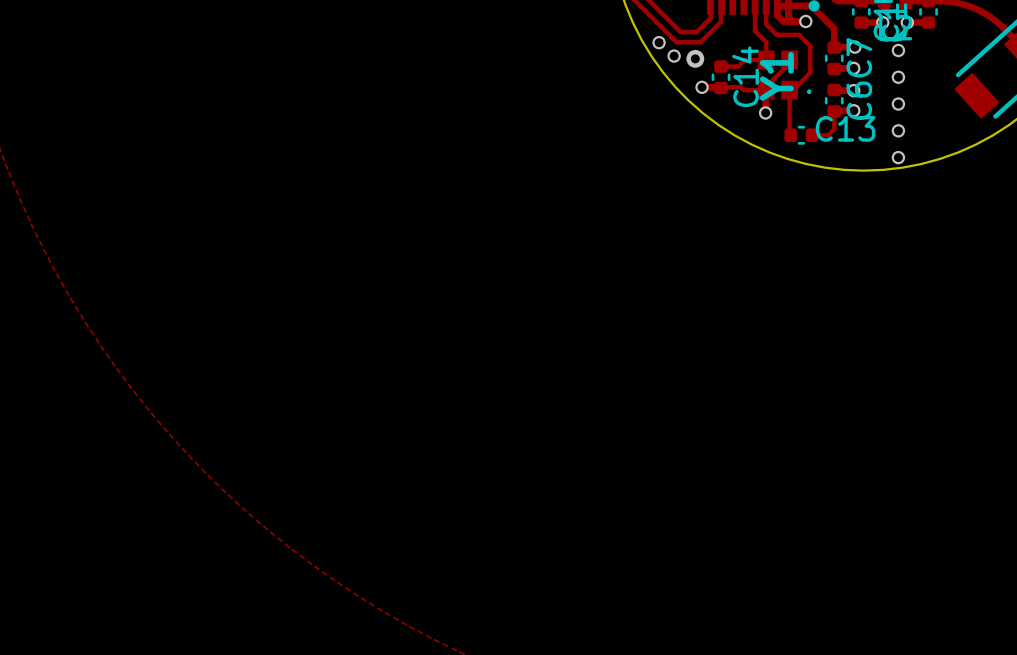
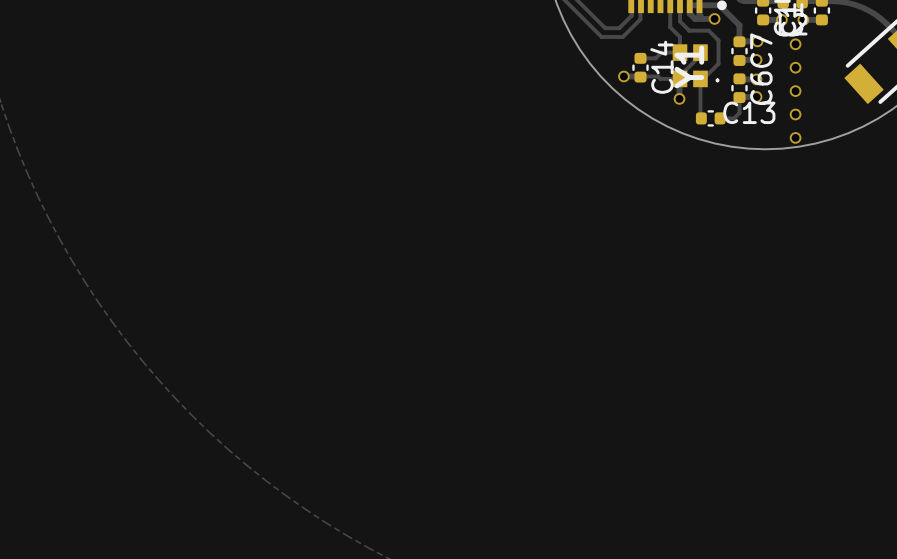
via: (659, 42) -> none
via: (674, 56) -> none
via: (695, 58) -> none

